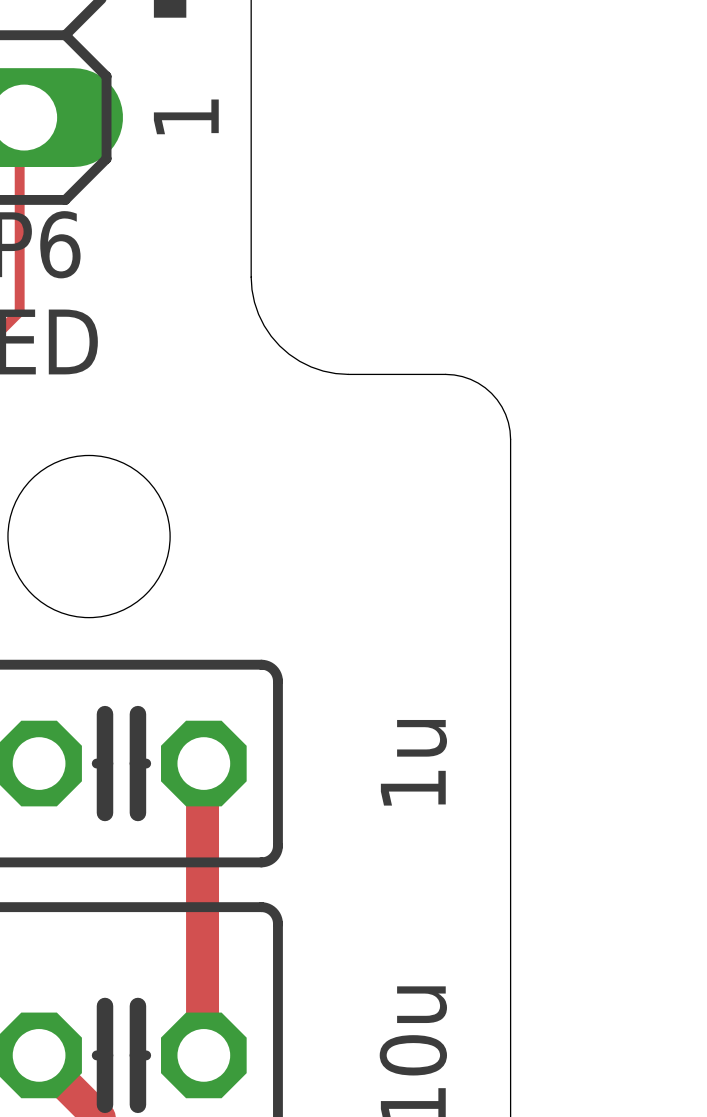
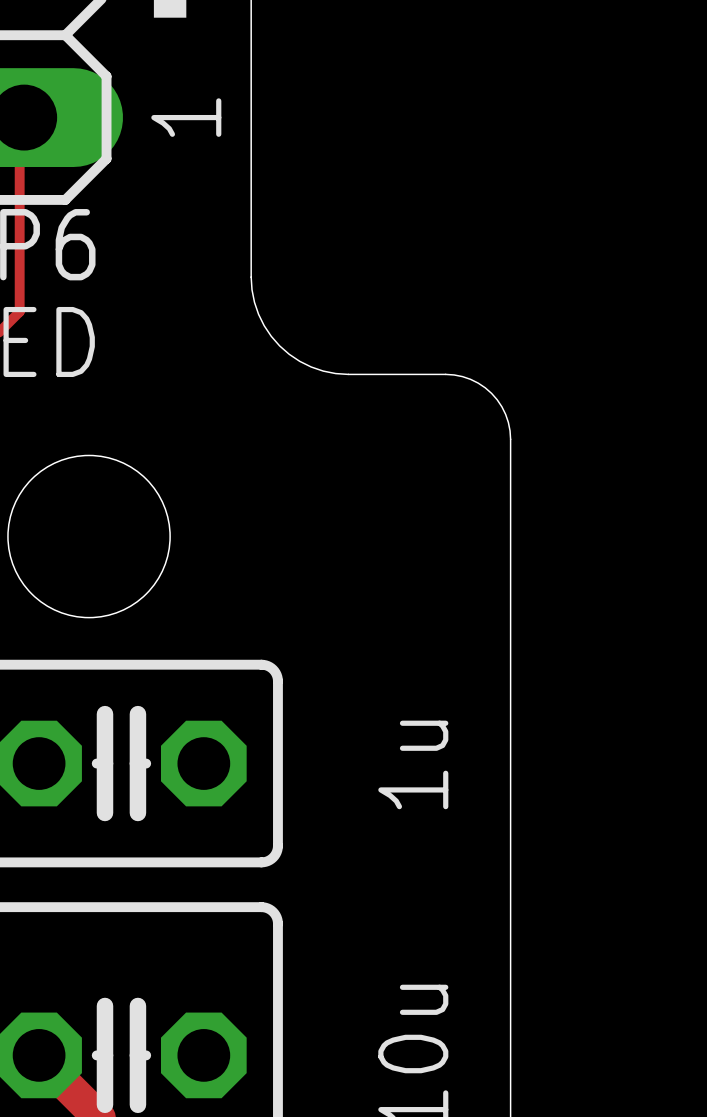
track: (203, 763) (203, 1055) -> none

